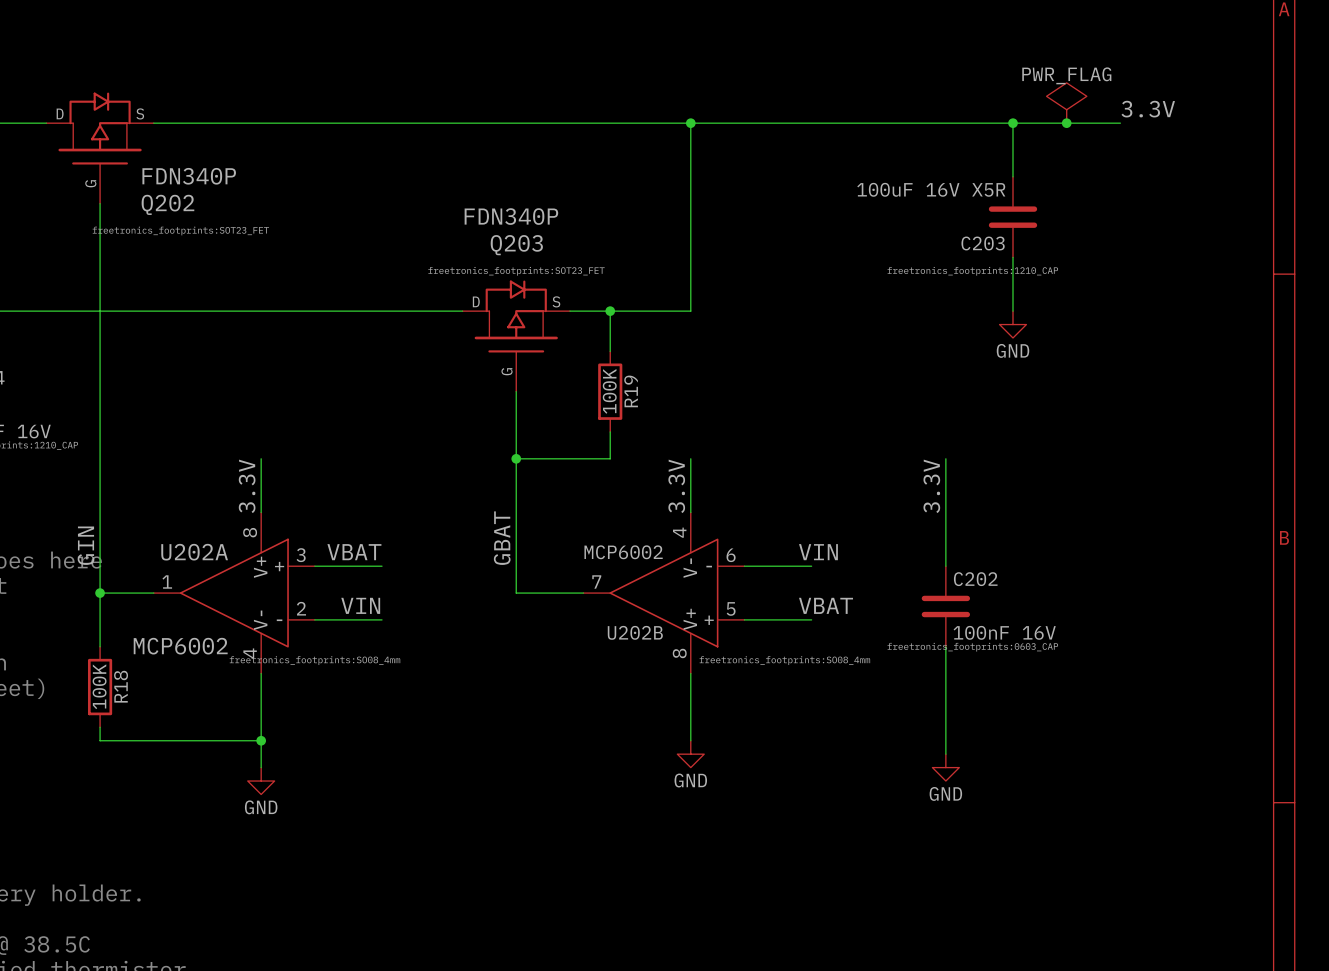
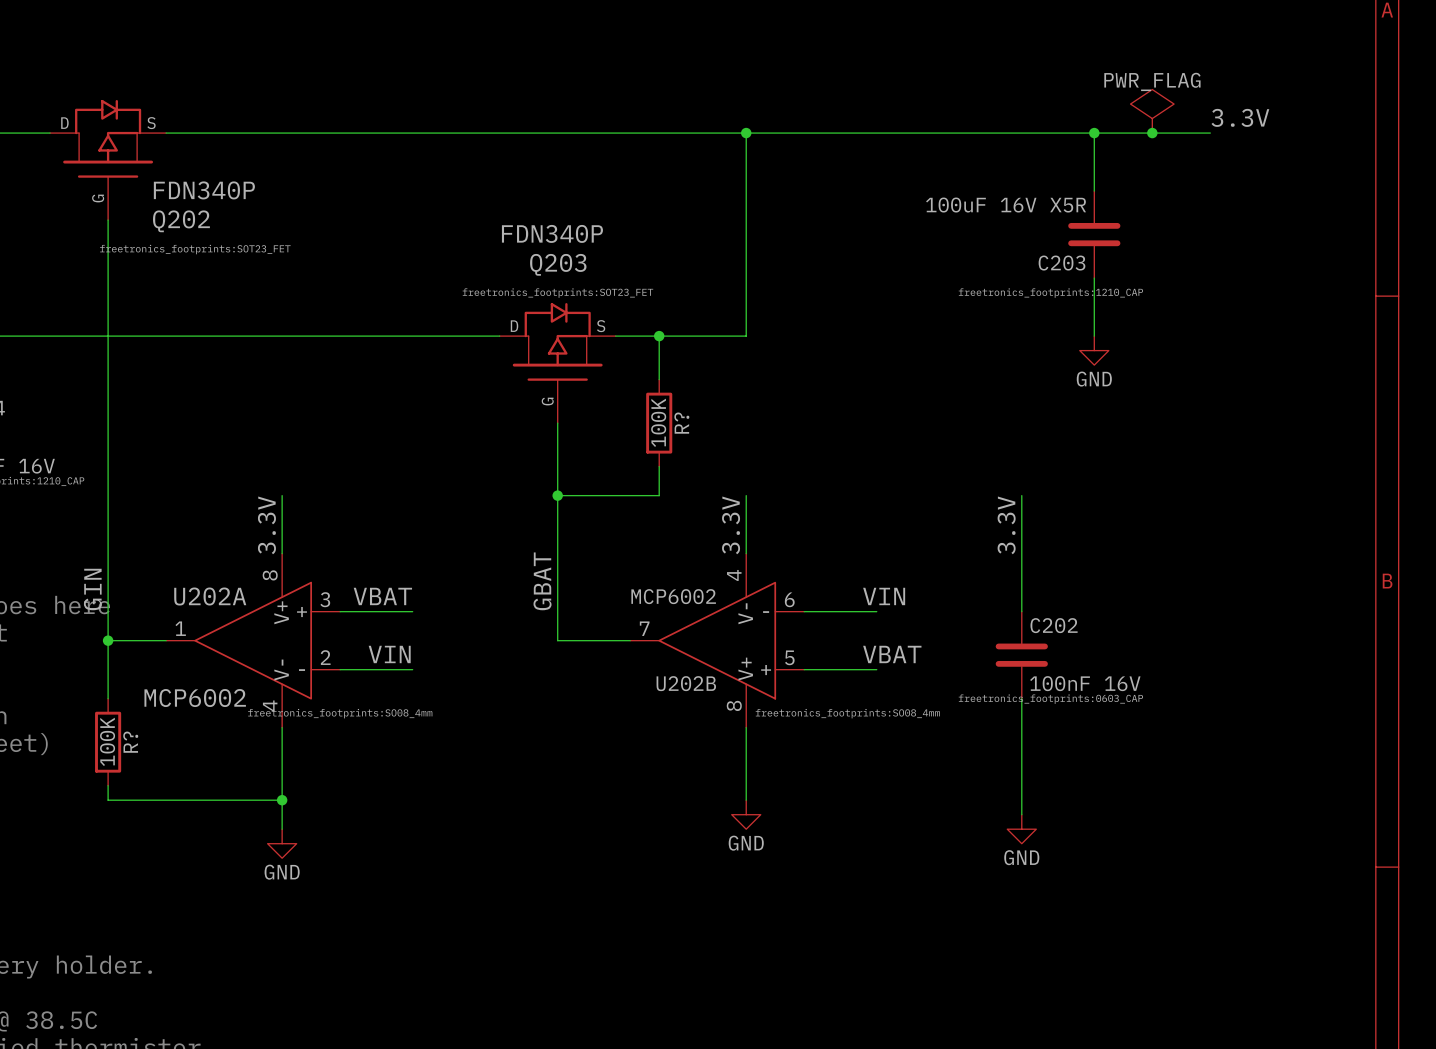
R19 name: R19 (631, 391) -> R? (681, 423)
R18 name: R18 (121, 686) -> R? (130, 742)

